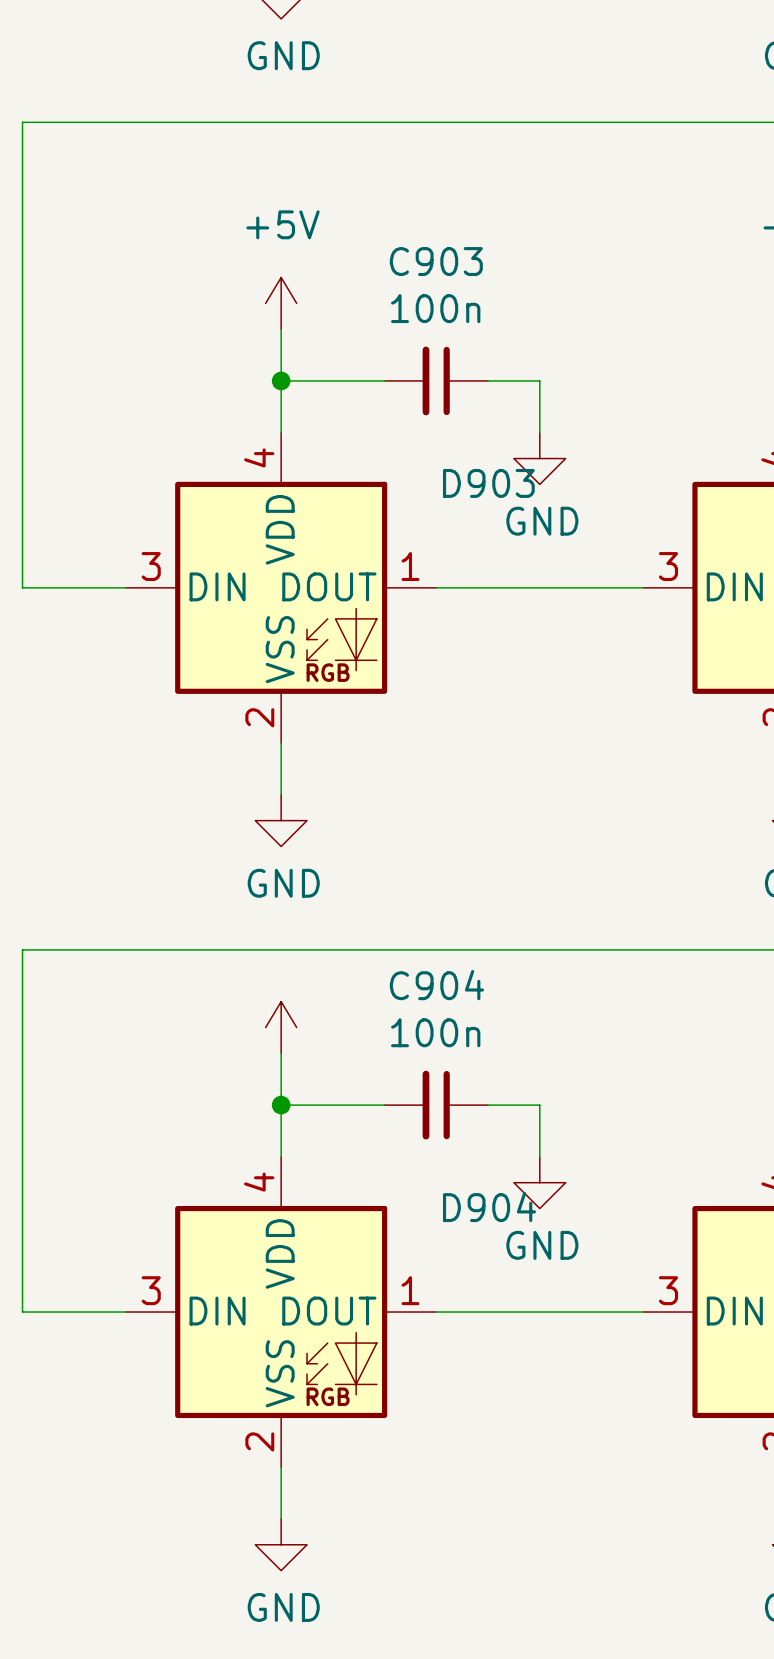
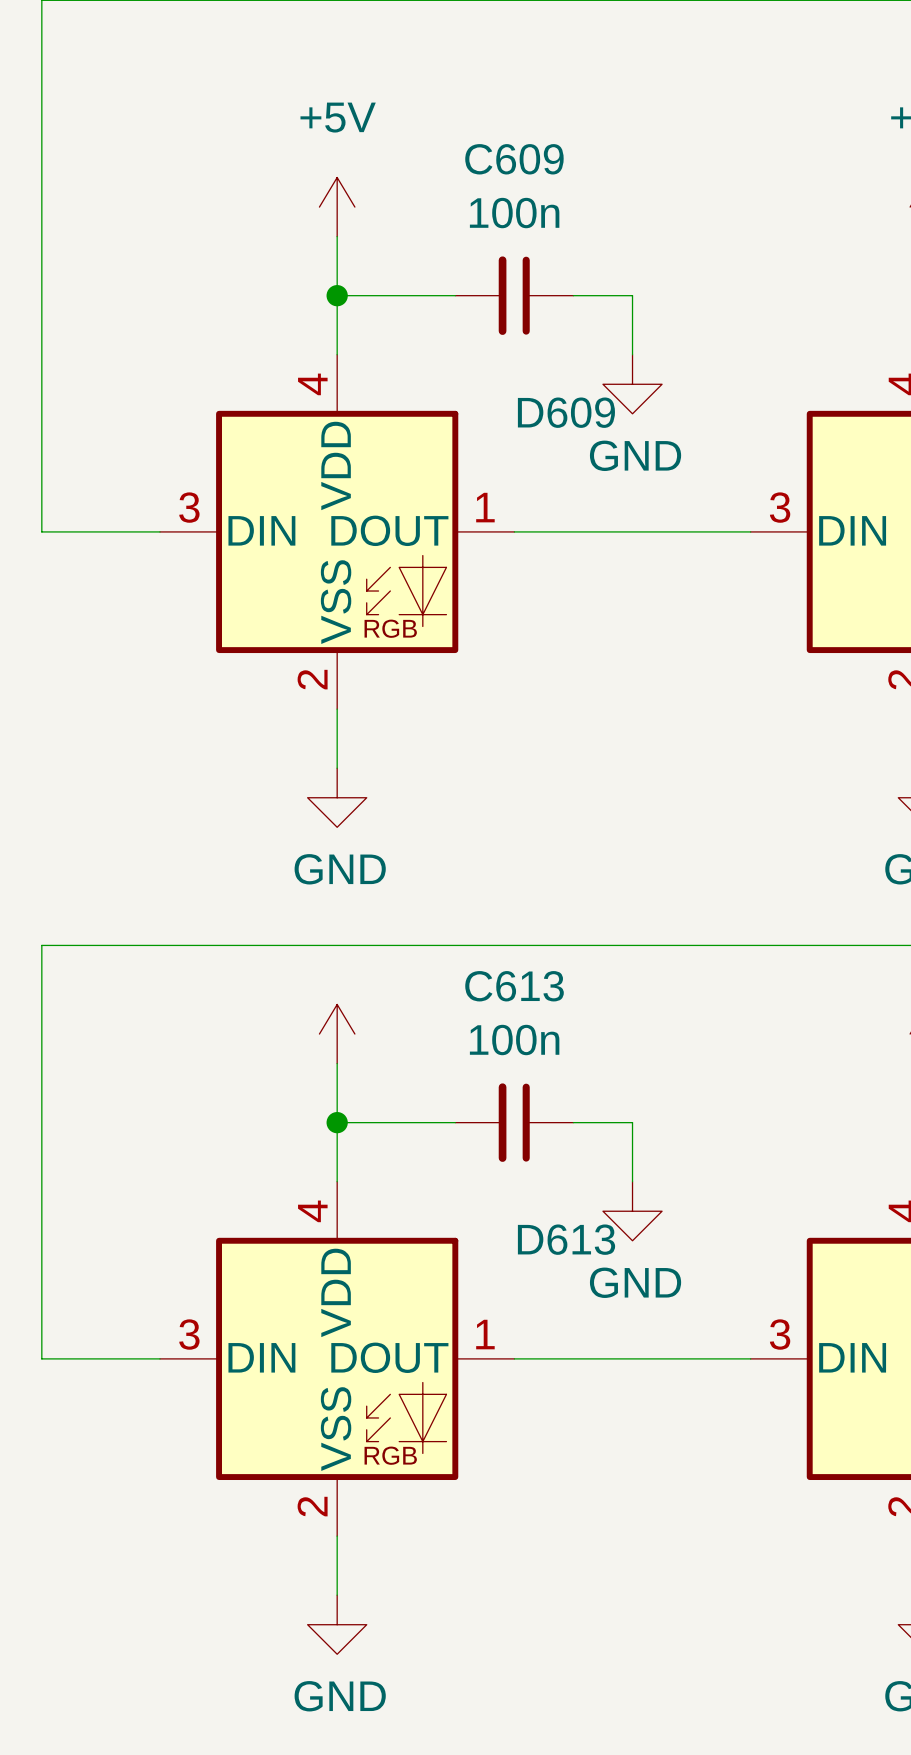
C903 name: C903 (436, 261) -> C609 (514, 159)
D903 name: D903 (488, 483) -> D609 (566, 412)
C904 name: C904 (436, 985) -> C613 (514, 986)
D904 name: D904 (489, 1206) -> D613 (566, 1239)

